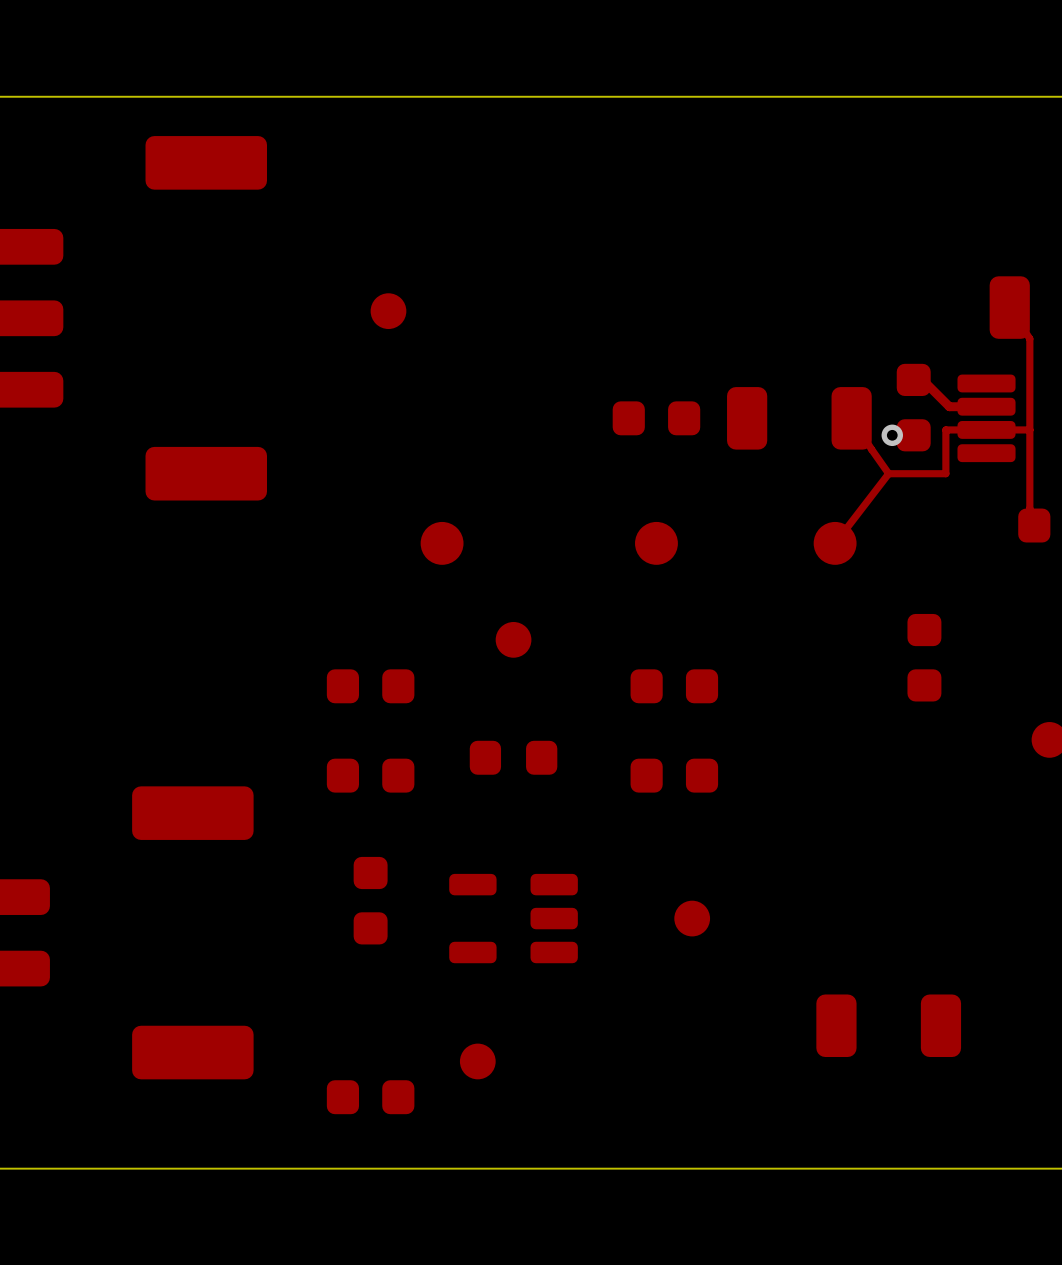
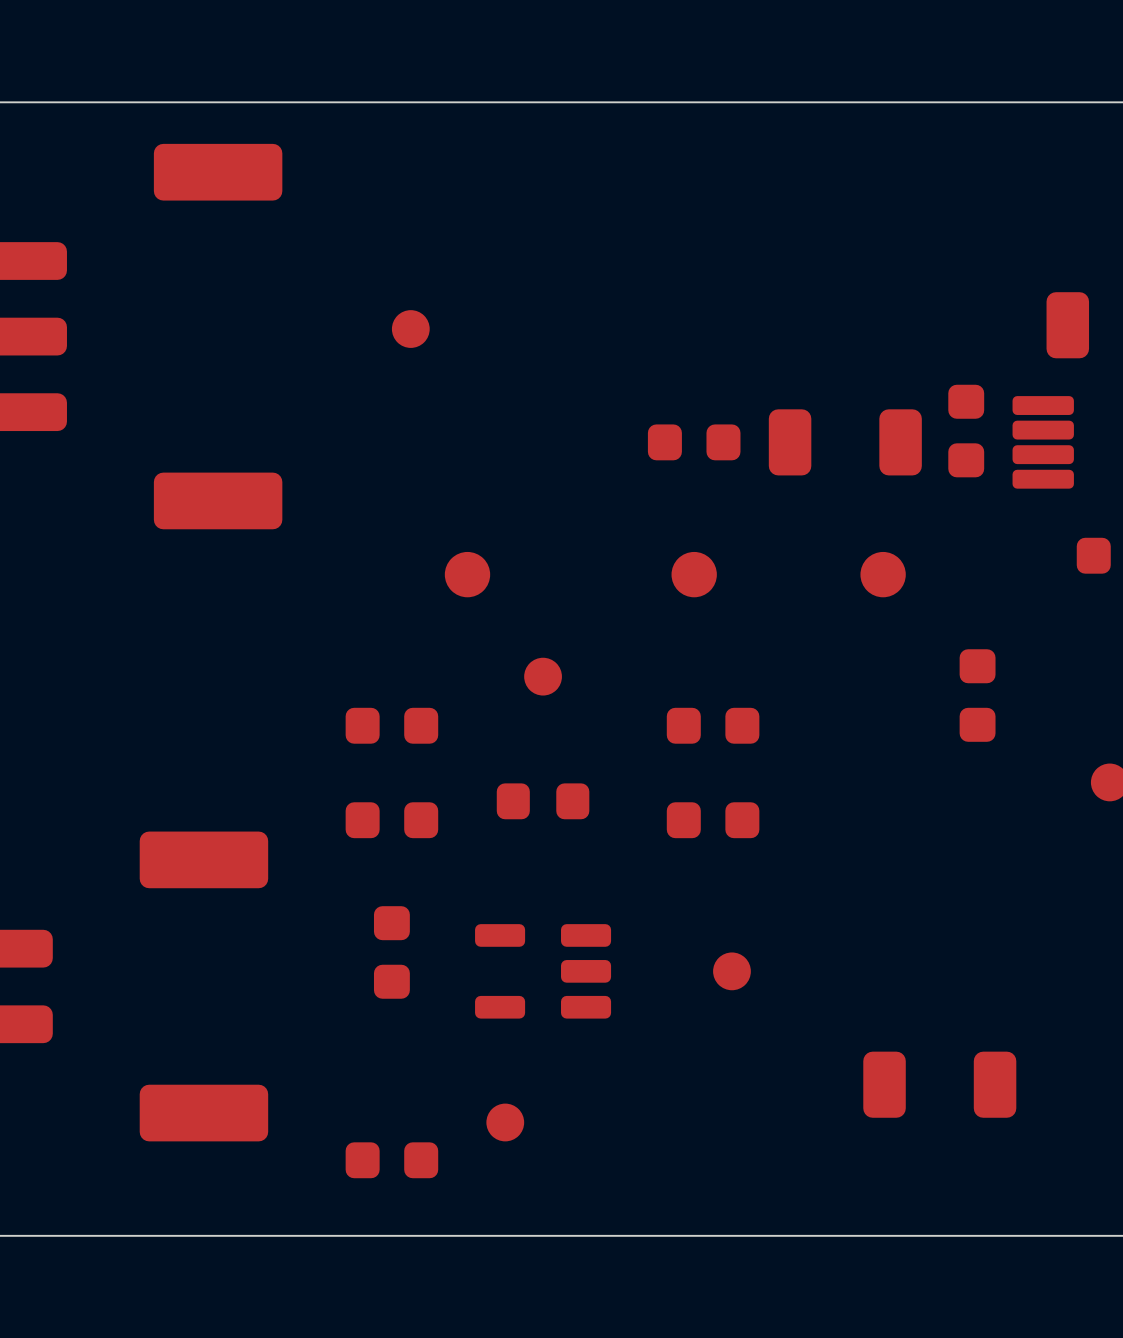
top track: (1009, 307) (1029, 338) (1029, 508) (1034, 525) -> none
top track: (913, 379) (922, 379) (949, 406) (986, 406) -> none
top track: (851, 418) (888, 473) -> none
top track: (1029, 429) (945, 429) (945, 473) (888, 473) -> none
via: (892, 435) -> none
top track: (888, 473) (835, 543) -> none

